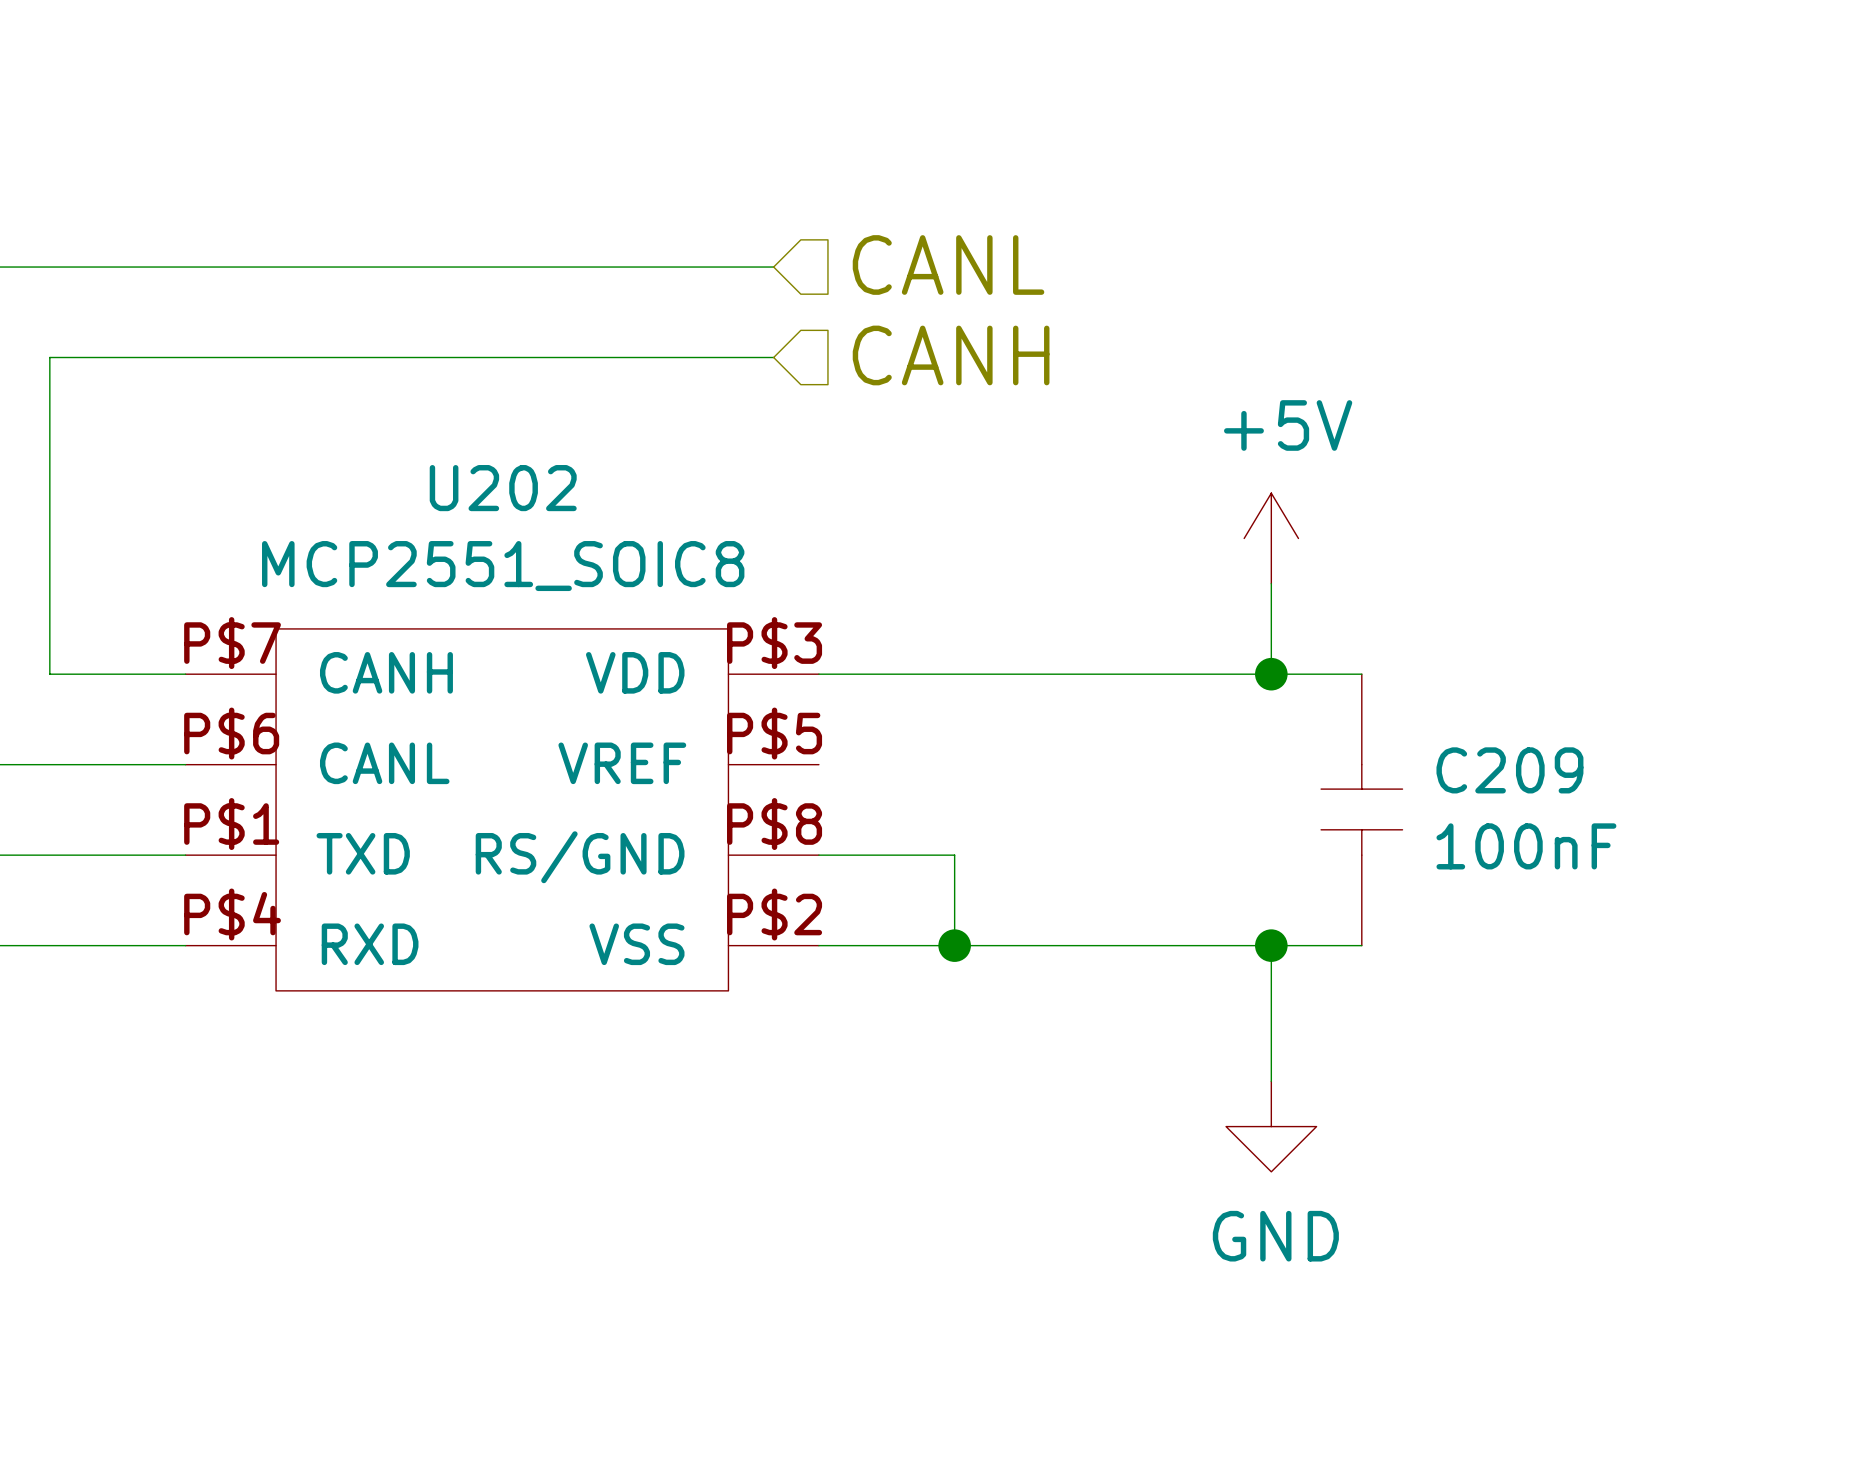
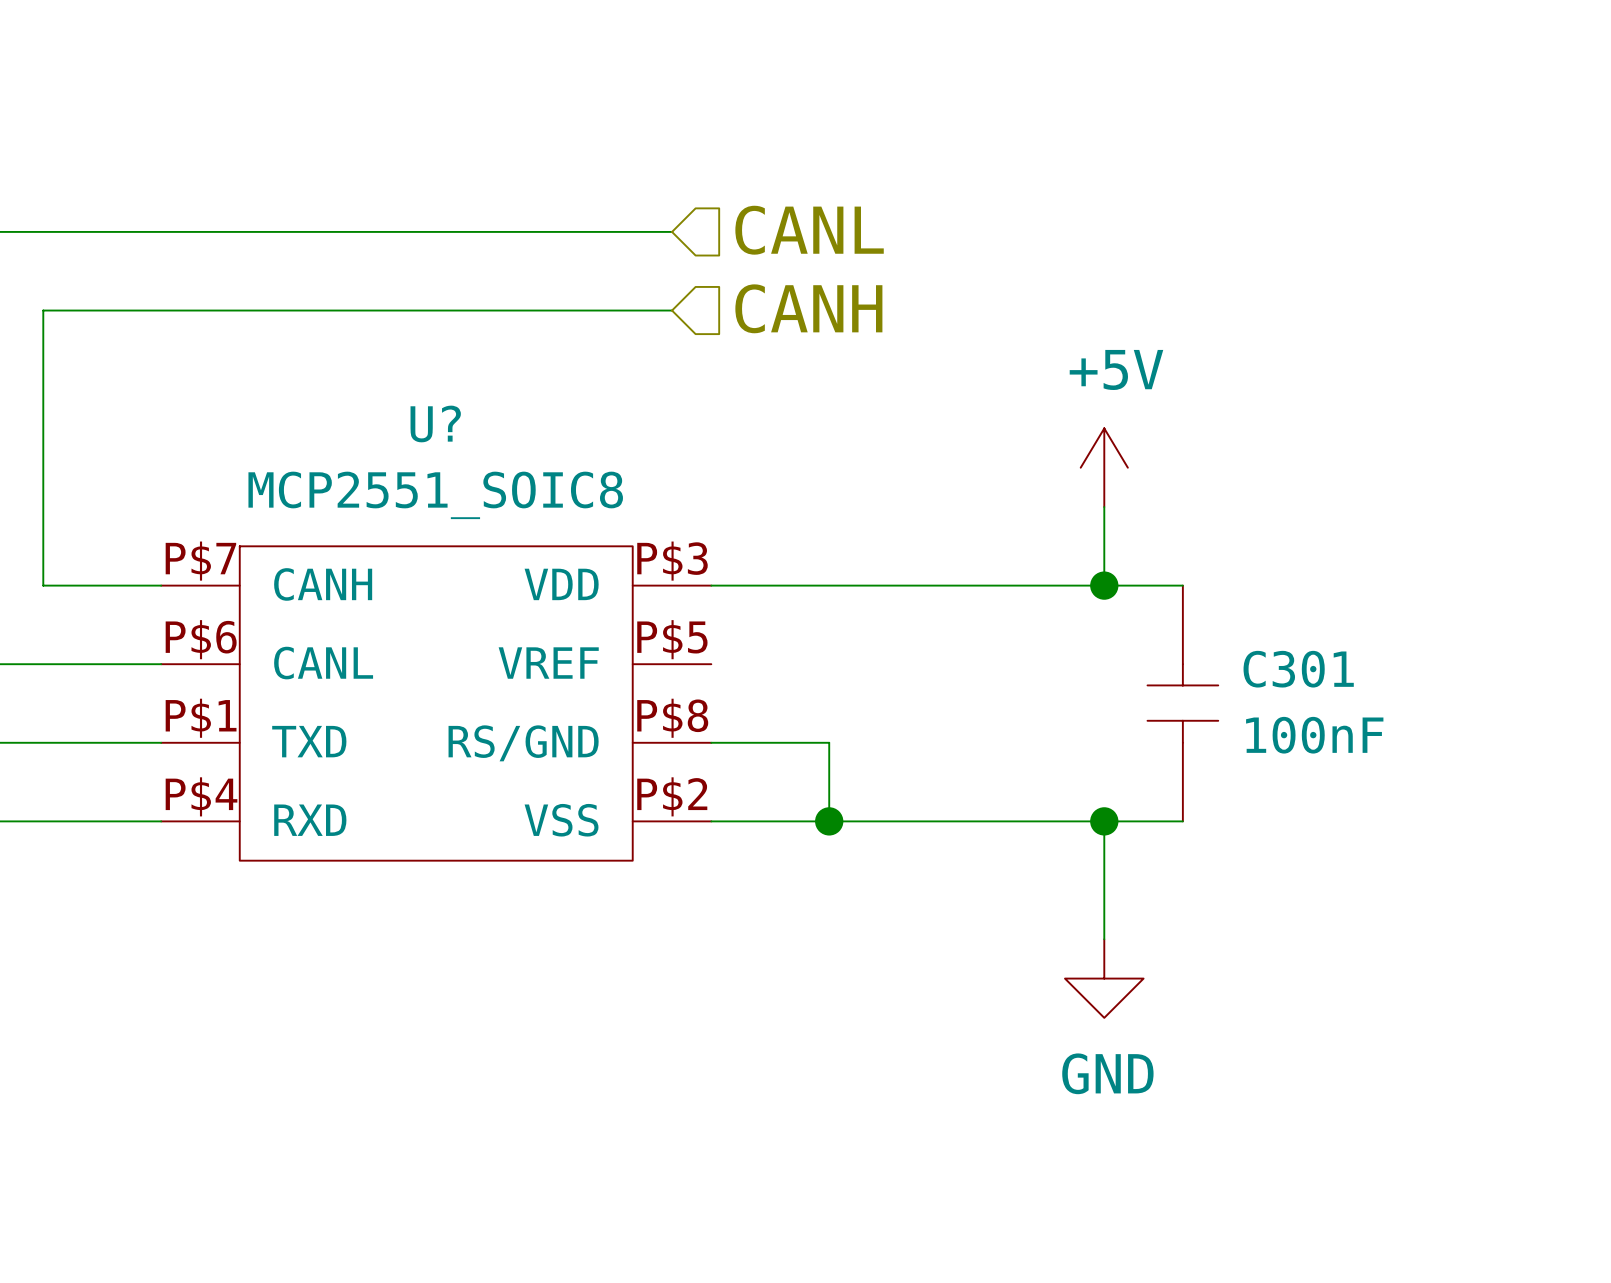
U202 name: U202 (503, 488) -> U? (435, 423)
C209 name: C209 (1509, 770) -> C301 (1298, 669)

